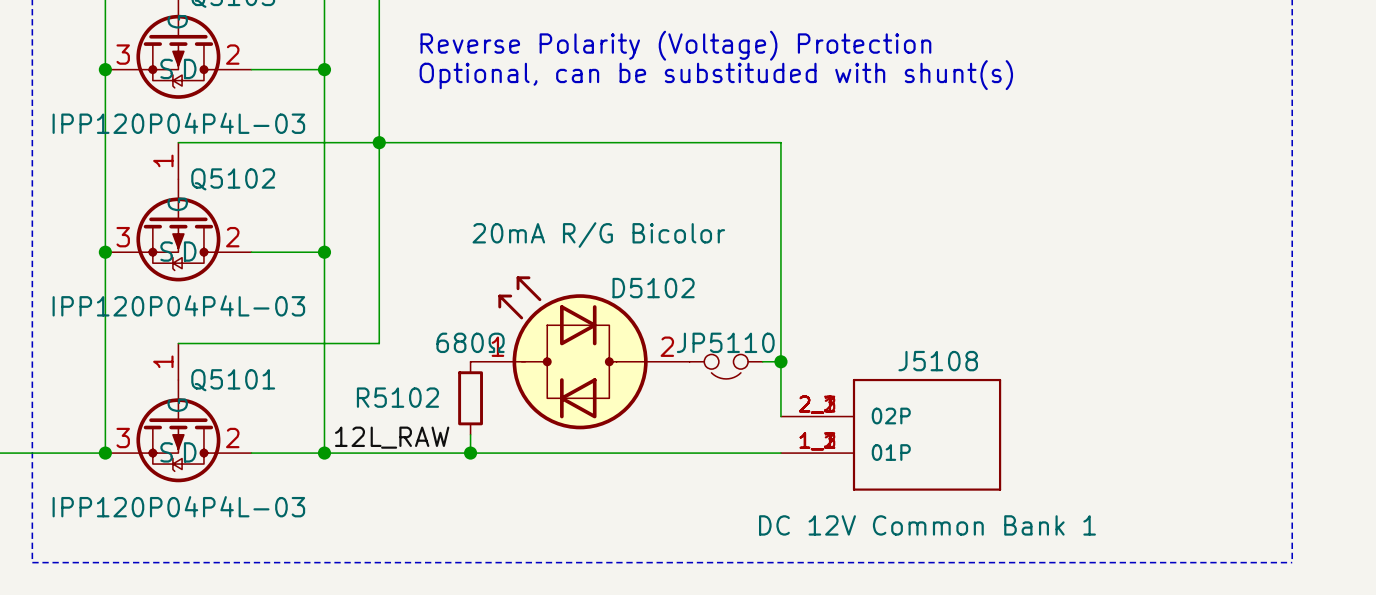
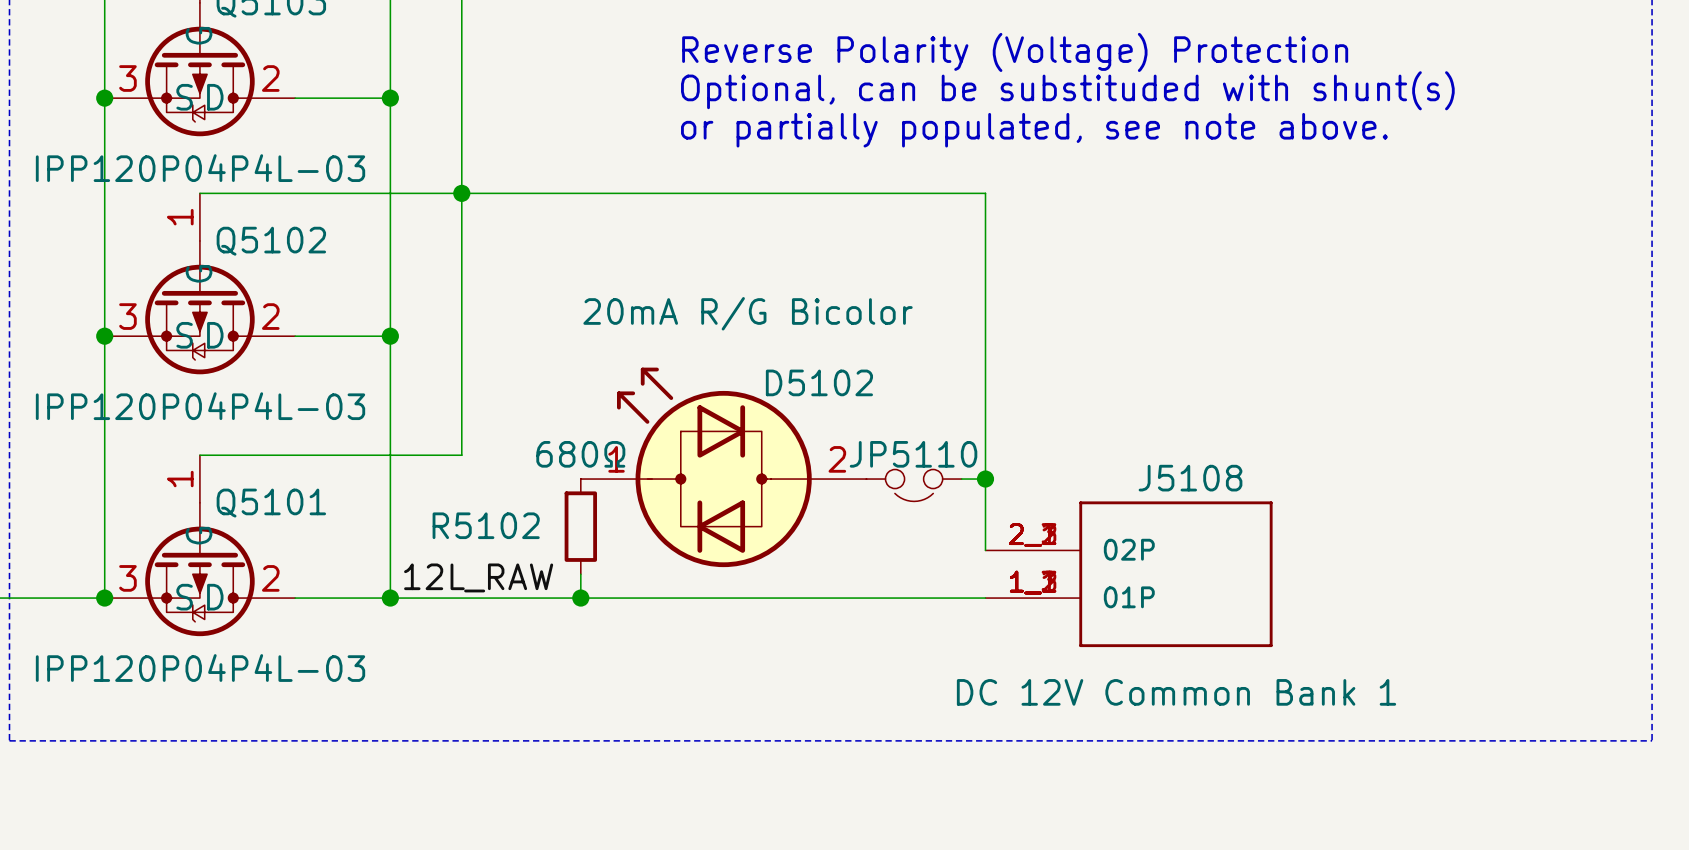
text position: Reverse Polarity (Voltage) Protection (675, 45) -> Reverse Polarity (Voltage) Protection (1015, 52)
text position: Optional, can be substituded with shunt(s) (716, 75) -> Optional, can be substituded with shunt(s) (1067, 90)
text: none -> or partially populated, see note above. (1034, 130)

